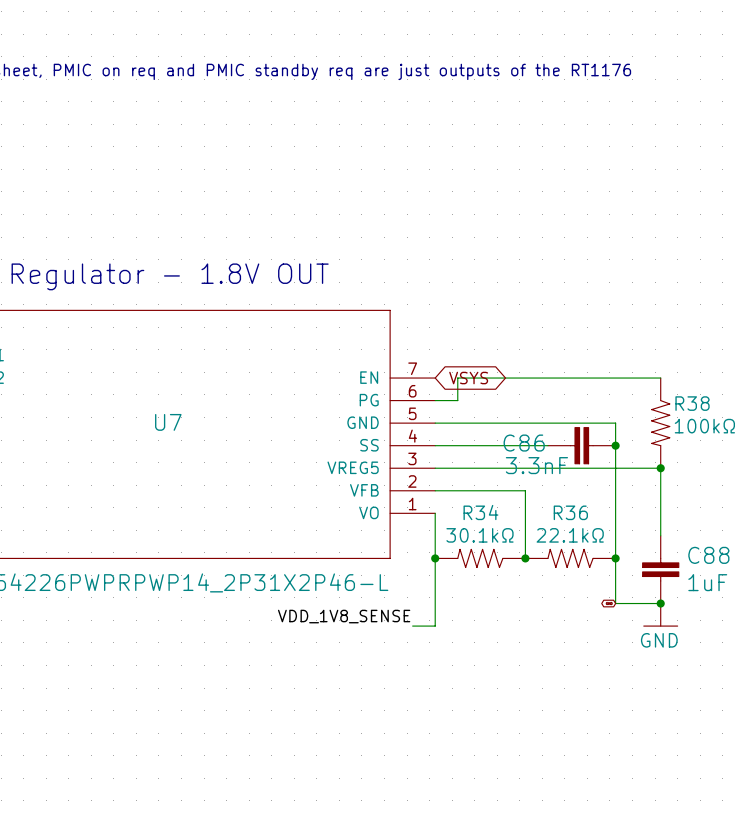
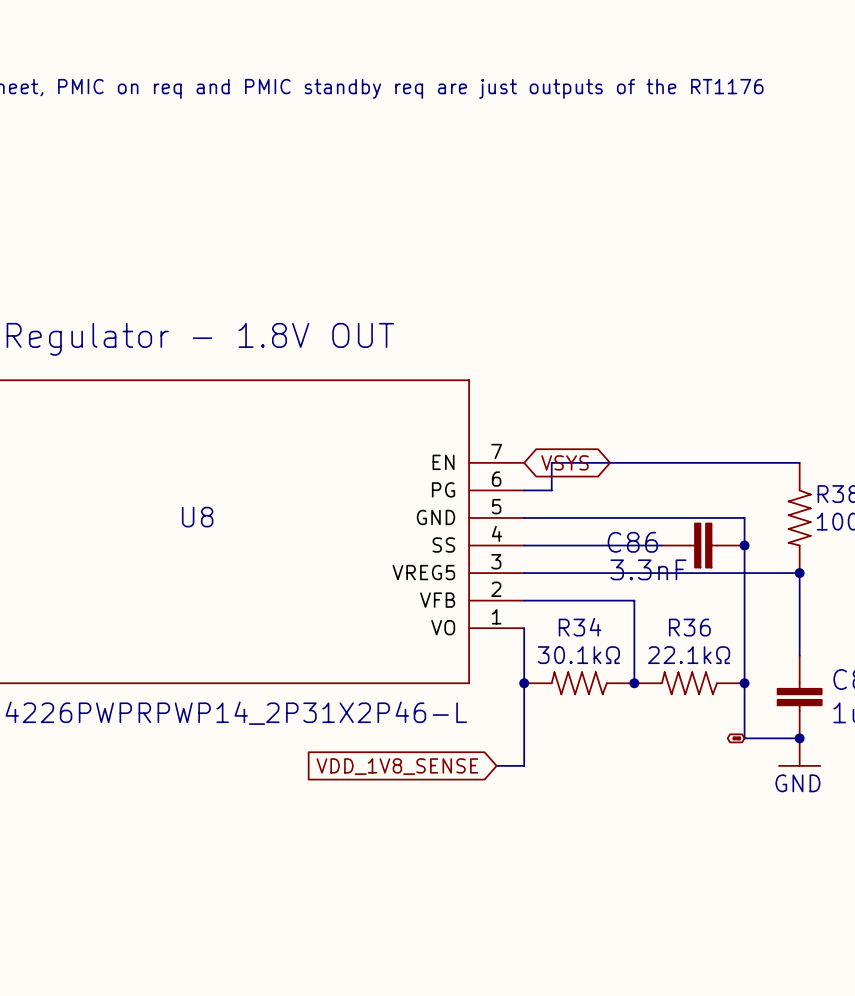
U7 name: U7 (168, 422) -> U8 (197, 517)
label: VDD_1V8_SENSE (344, 616) -> none
global label: none -> VDD_1V8_SENSE (397, 766)

